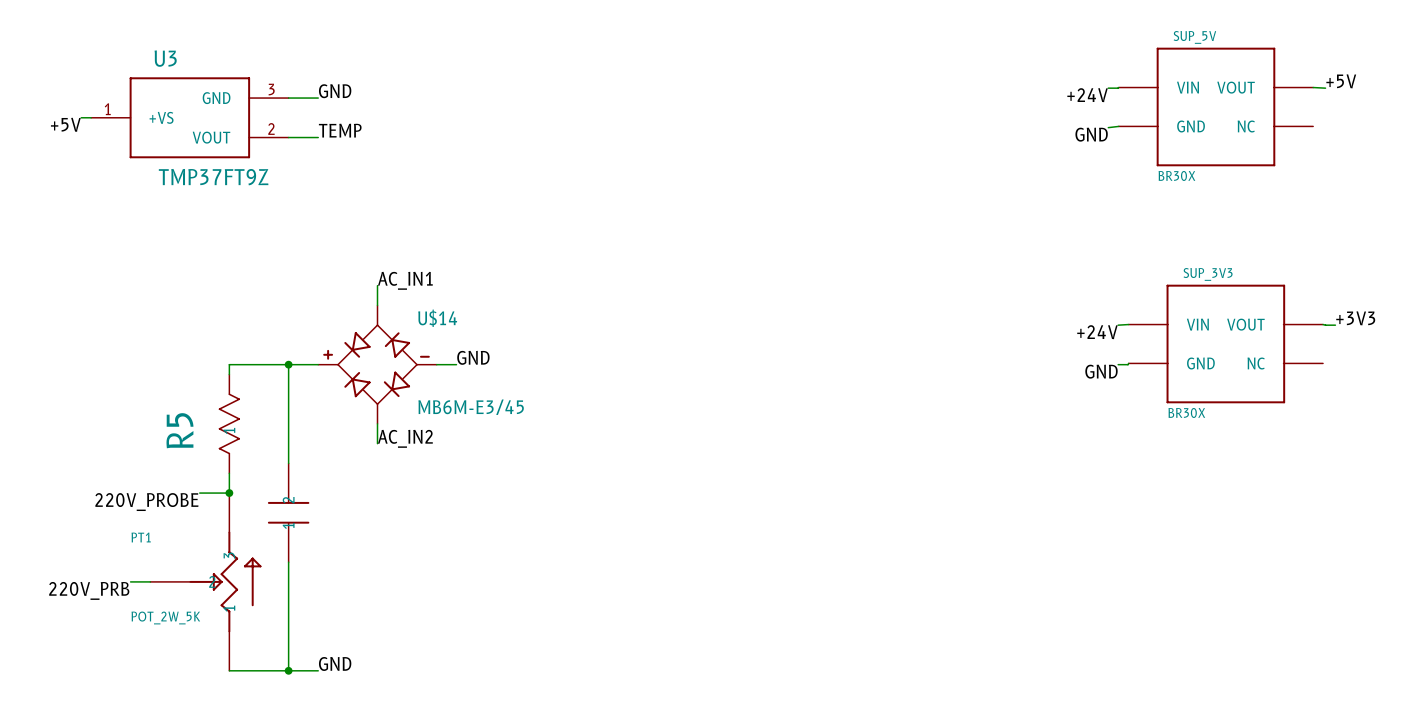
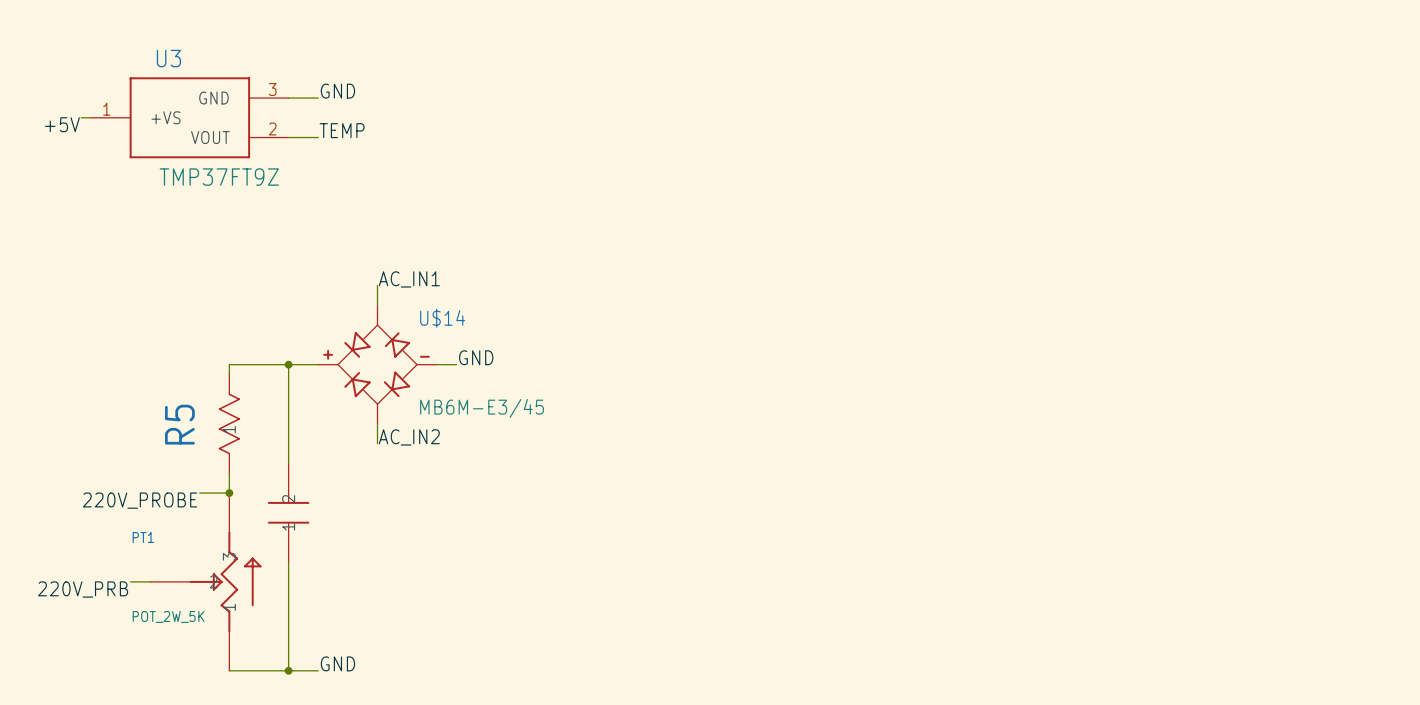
label: +5V (1341, 81) -> none
wire: (1118, 87) (1108, 88) -> none
wire: (1313, 87) (1325, 88) -> none
label: +24V (1087, 95) -> none
SUP_5V: BR30X (1215, 106) -> none
wire: (1118, 126) (1108, 127) -> none
label: GND (1091, 134) -> none
label: +3V3 (1355, 318) -> none
wire: (1128, 324) (1118, 325) -> none
wire: (1323, 324) (1335, 325) -> none
label: +24V (1097, 332) -> none
SUP_3V3: BR30X (1225, 343) -> none
wire: (1128, 363) (1118, 364) -> none
label: GND (1101, 371) -> none

